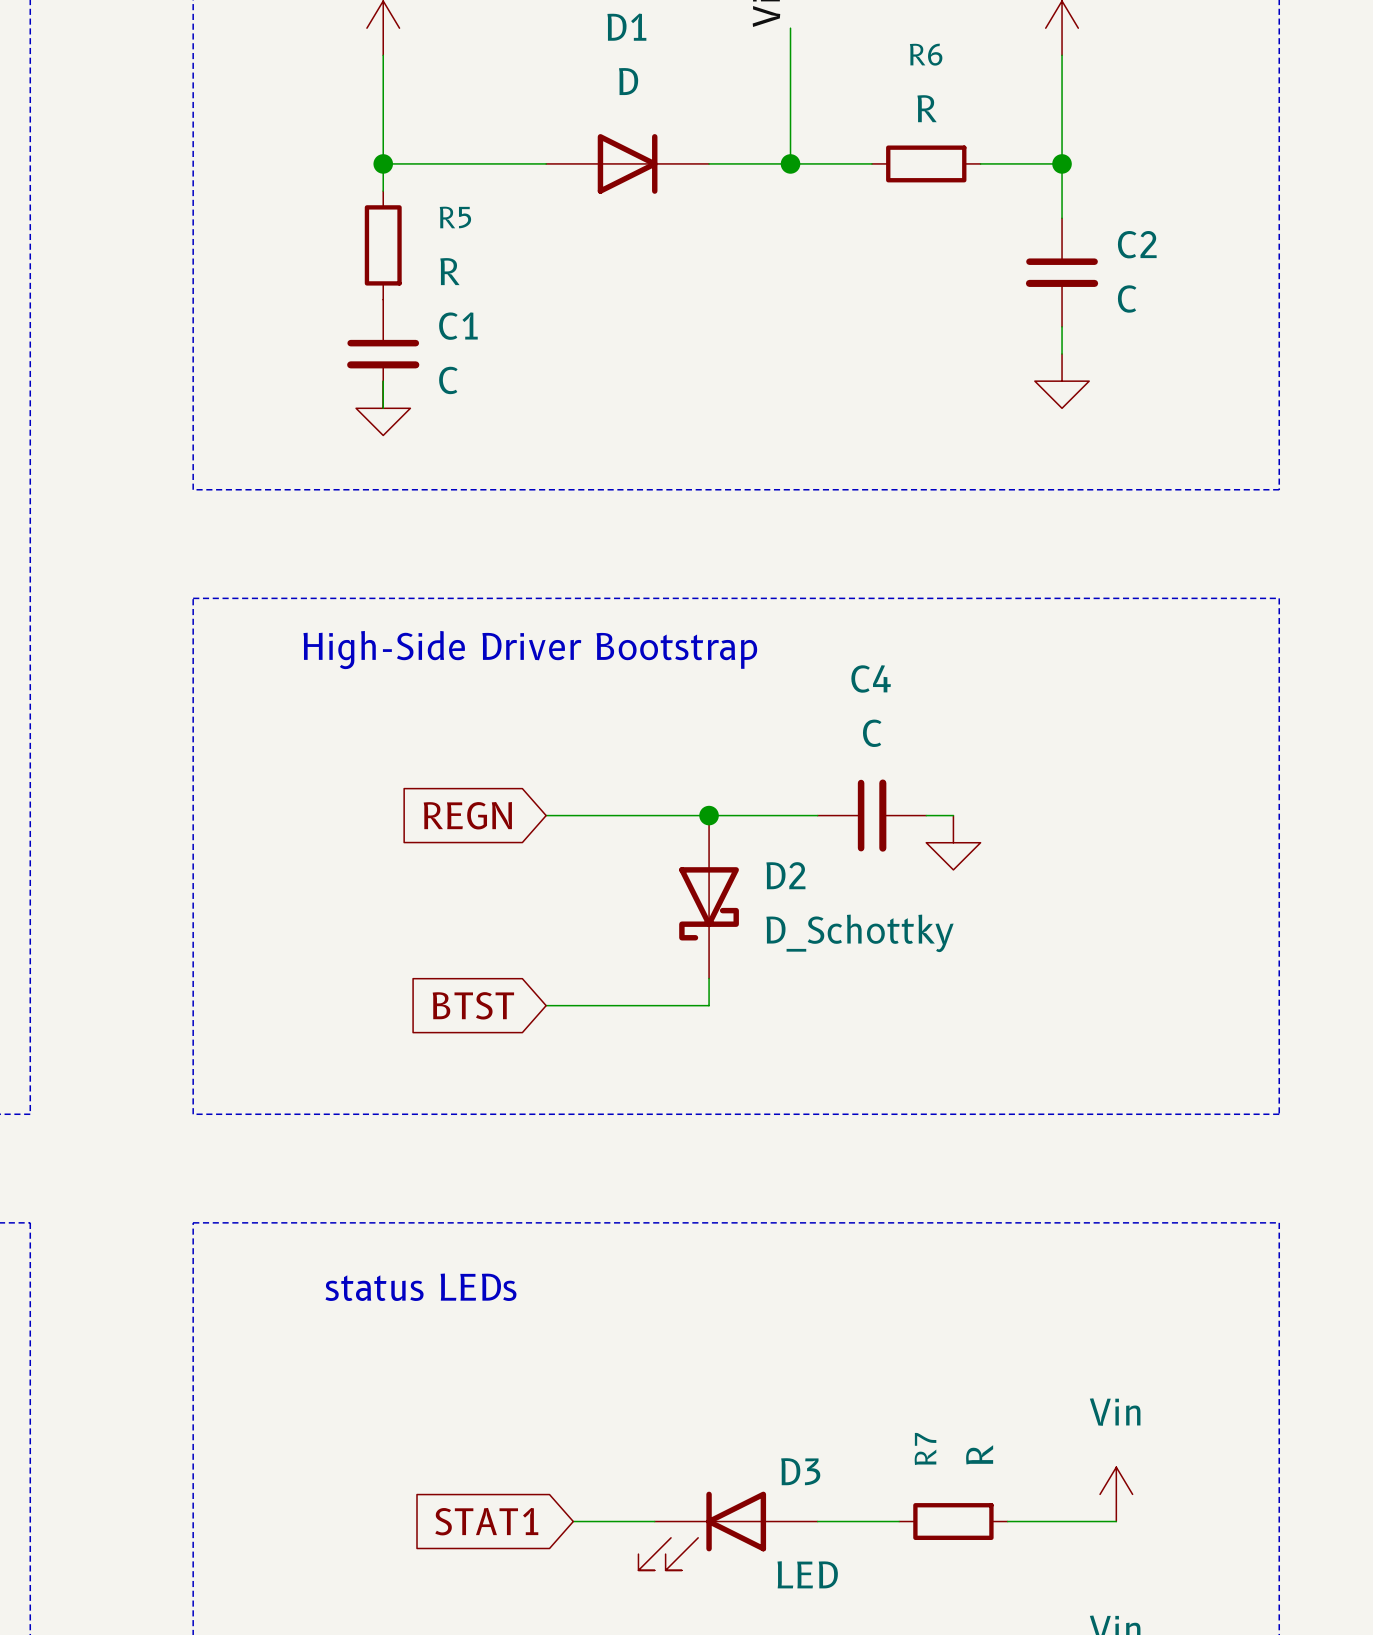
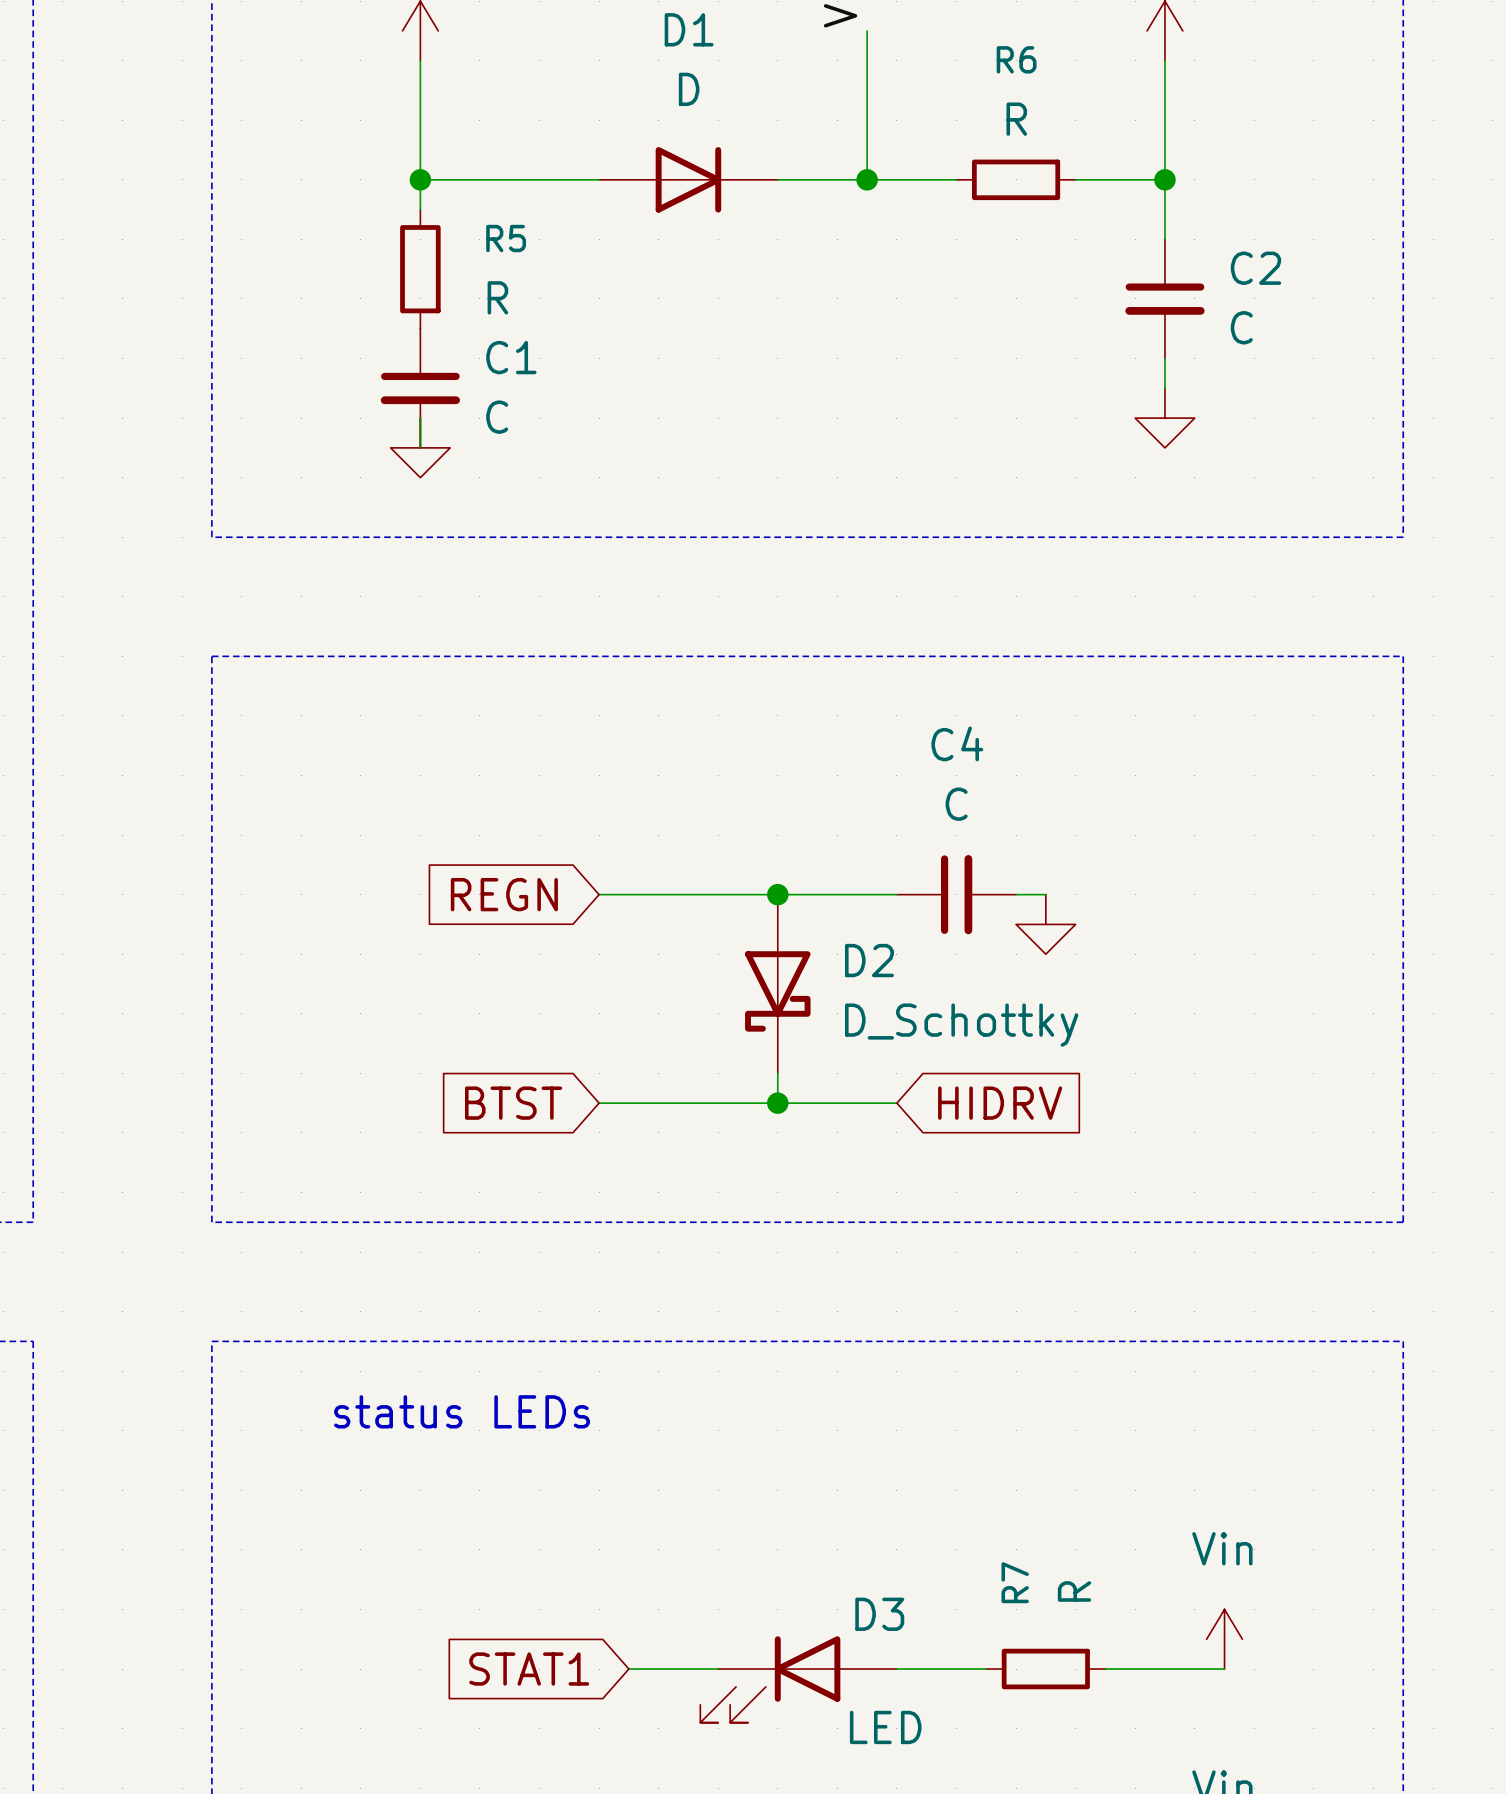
text: High-Side Driver Bootstrap (530, 650) -> none
wire: none -> (777, 1103) (896, 1103)
junction: none -> (777, 1103)
global label: none -> HIDRV (1000, 1103)

